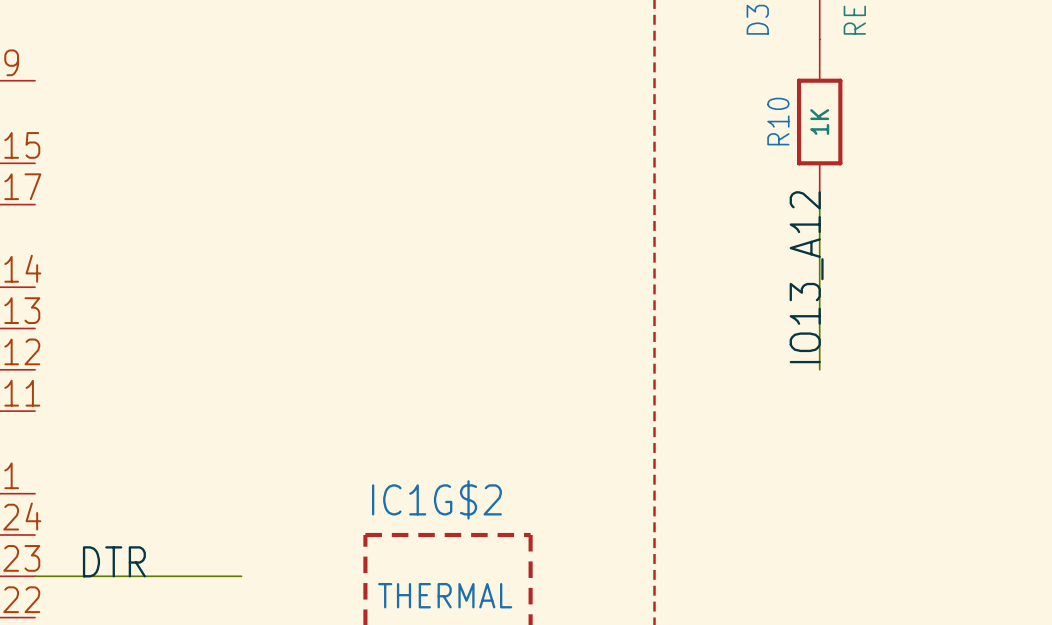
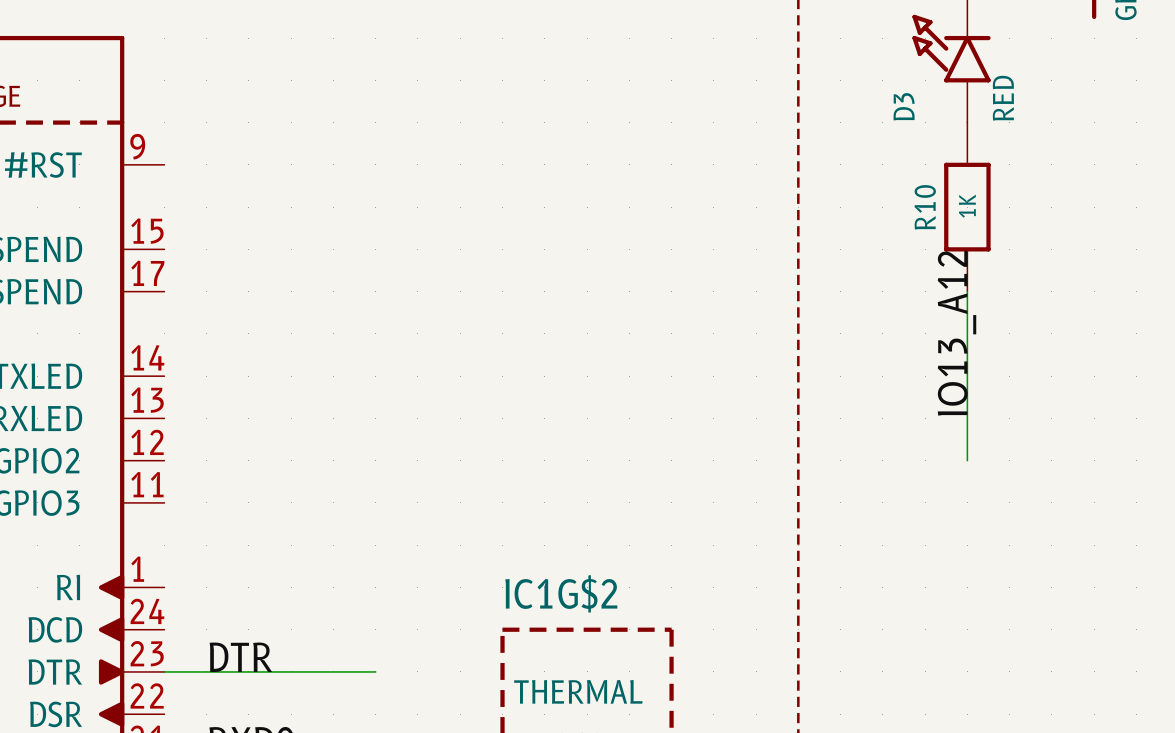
label position: IO13_A12 (806, 277) -> IO13_A12 (957, 333)

